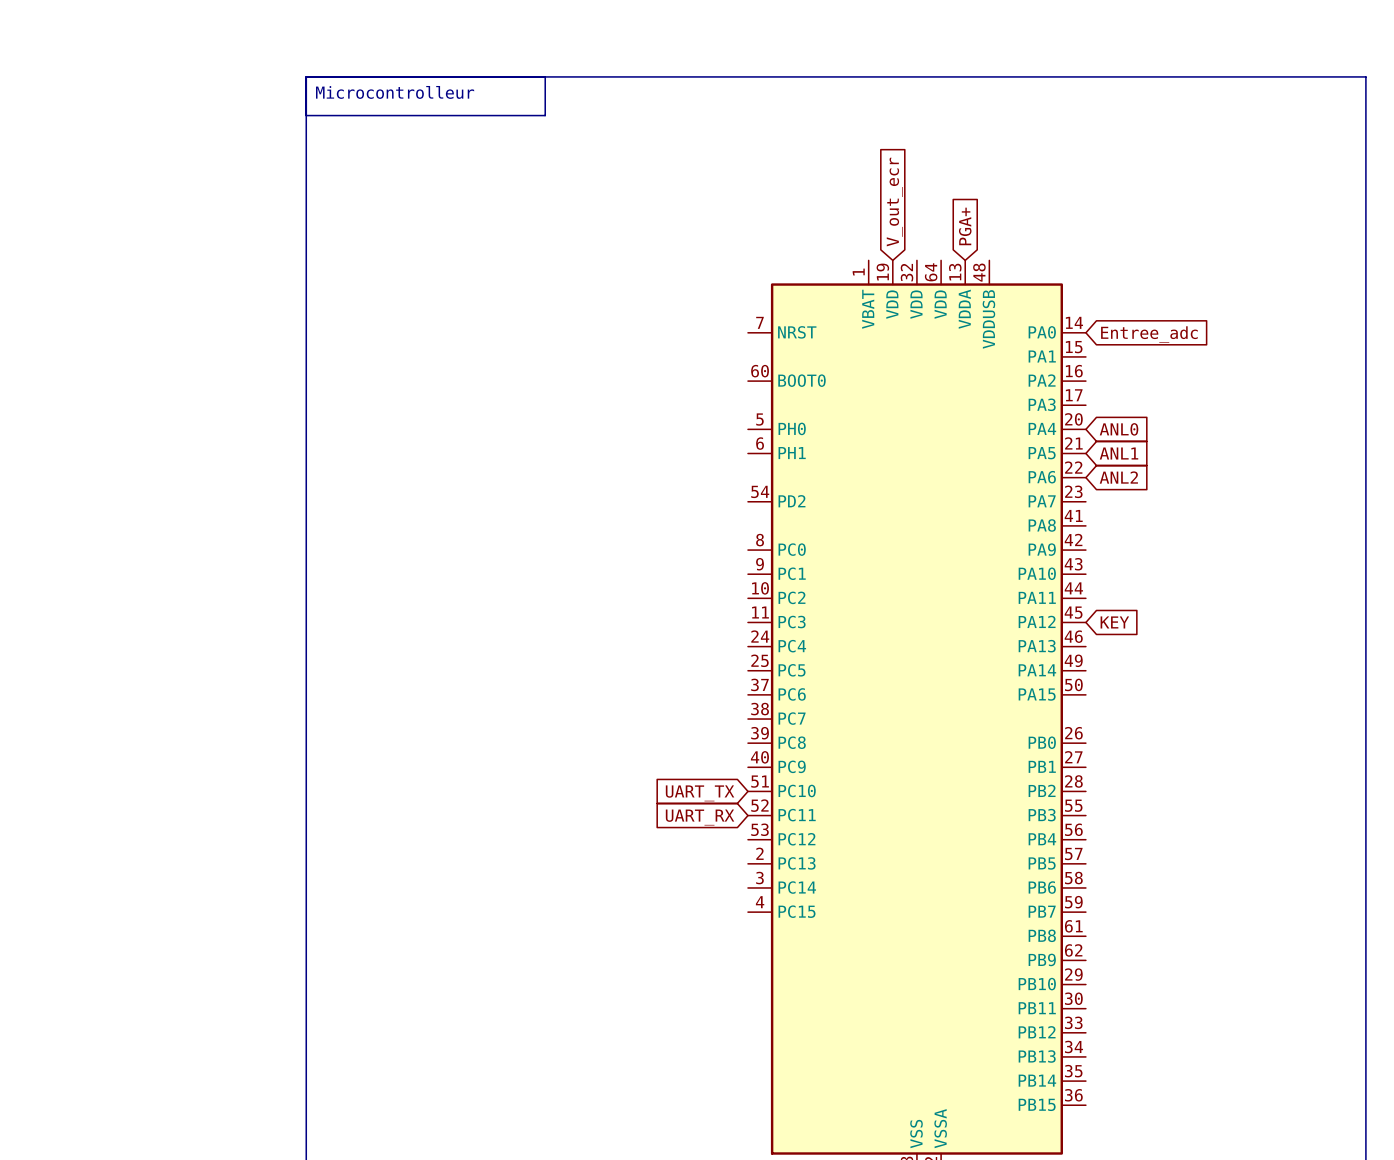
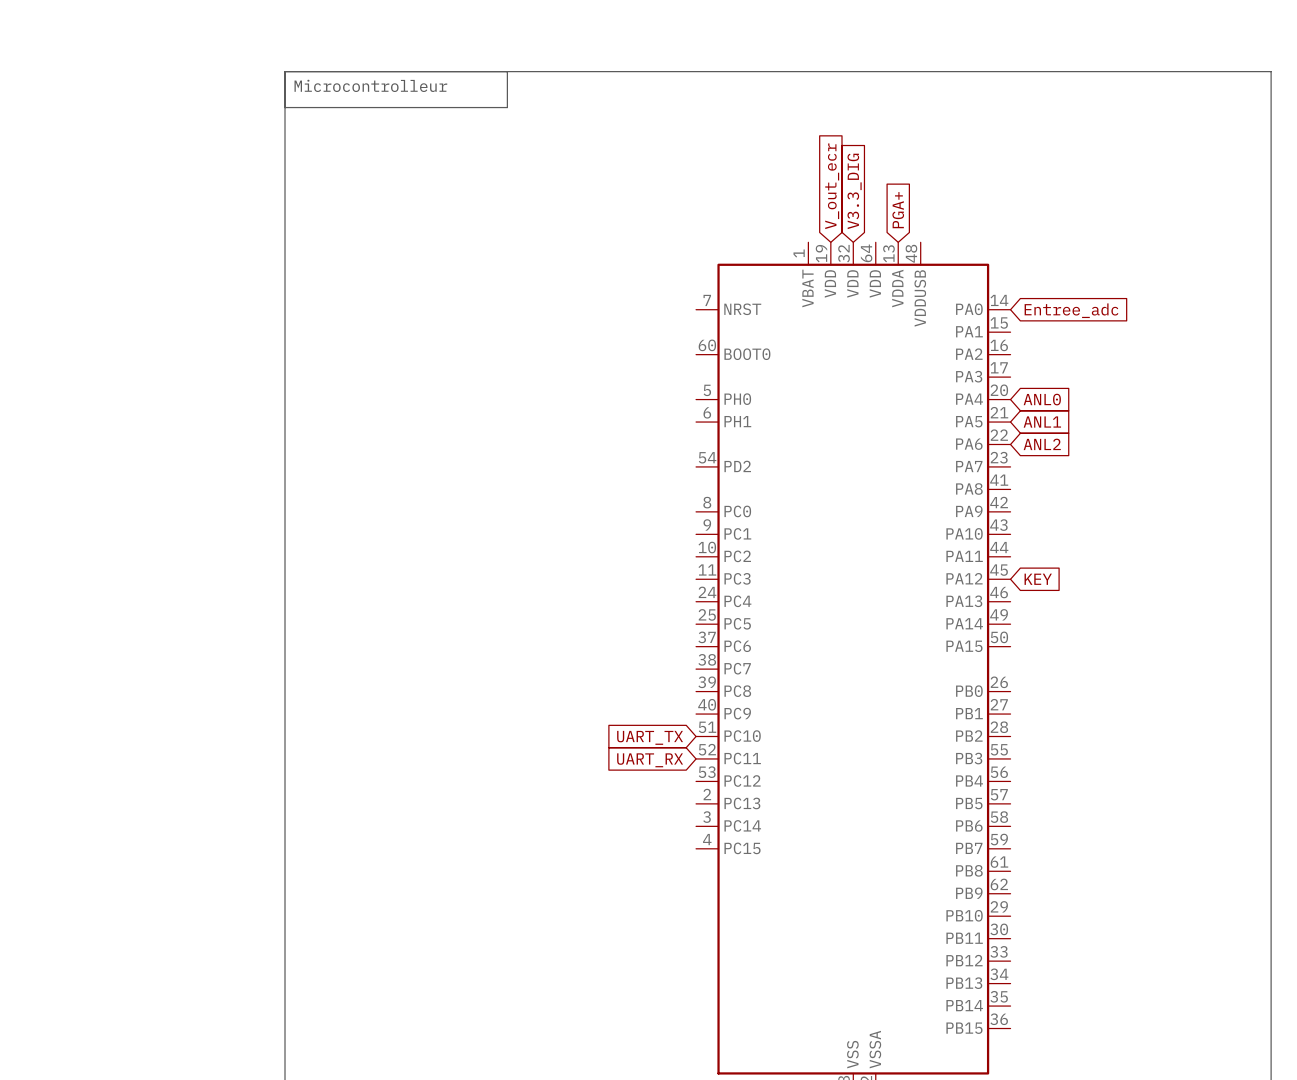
global label: none -> V3.3_DIG (854, 191)

